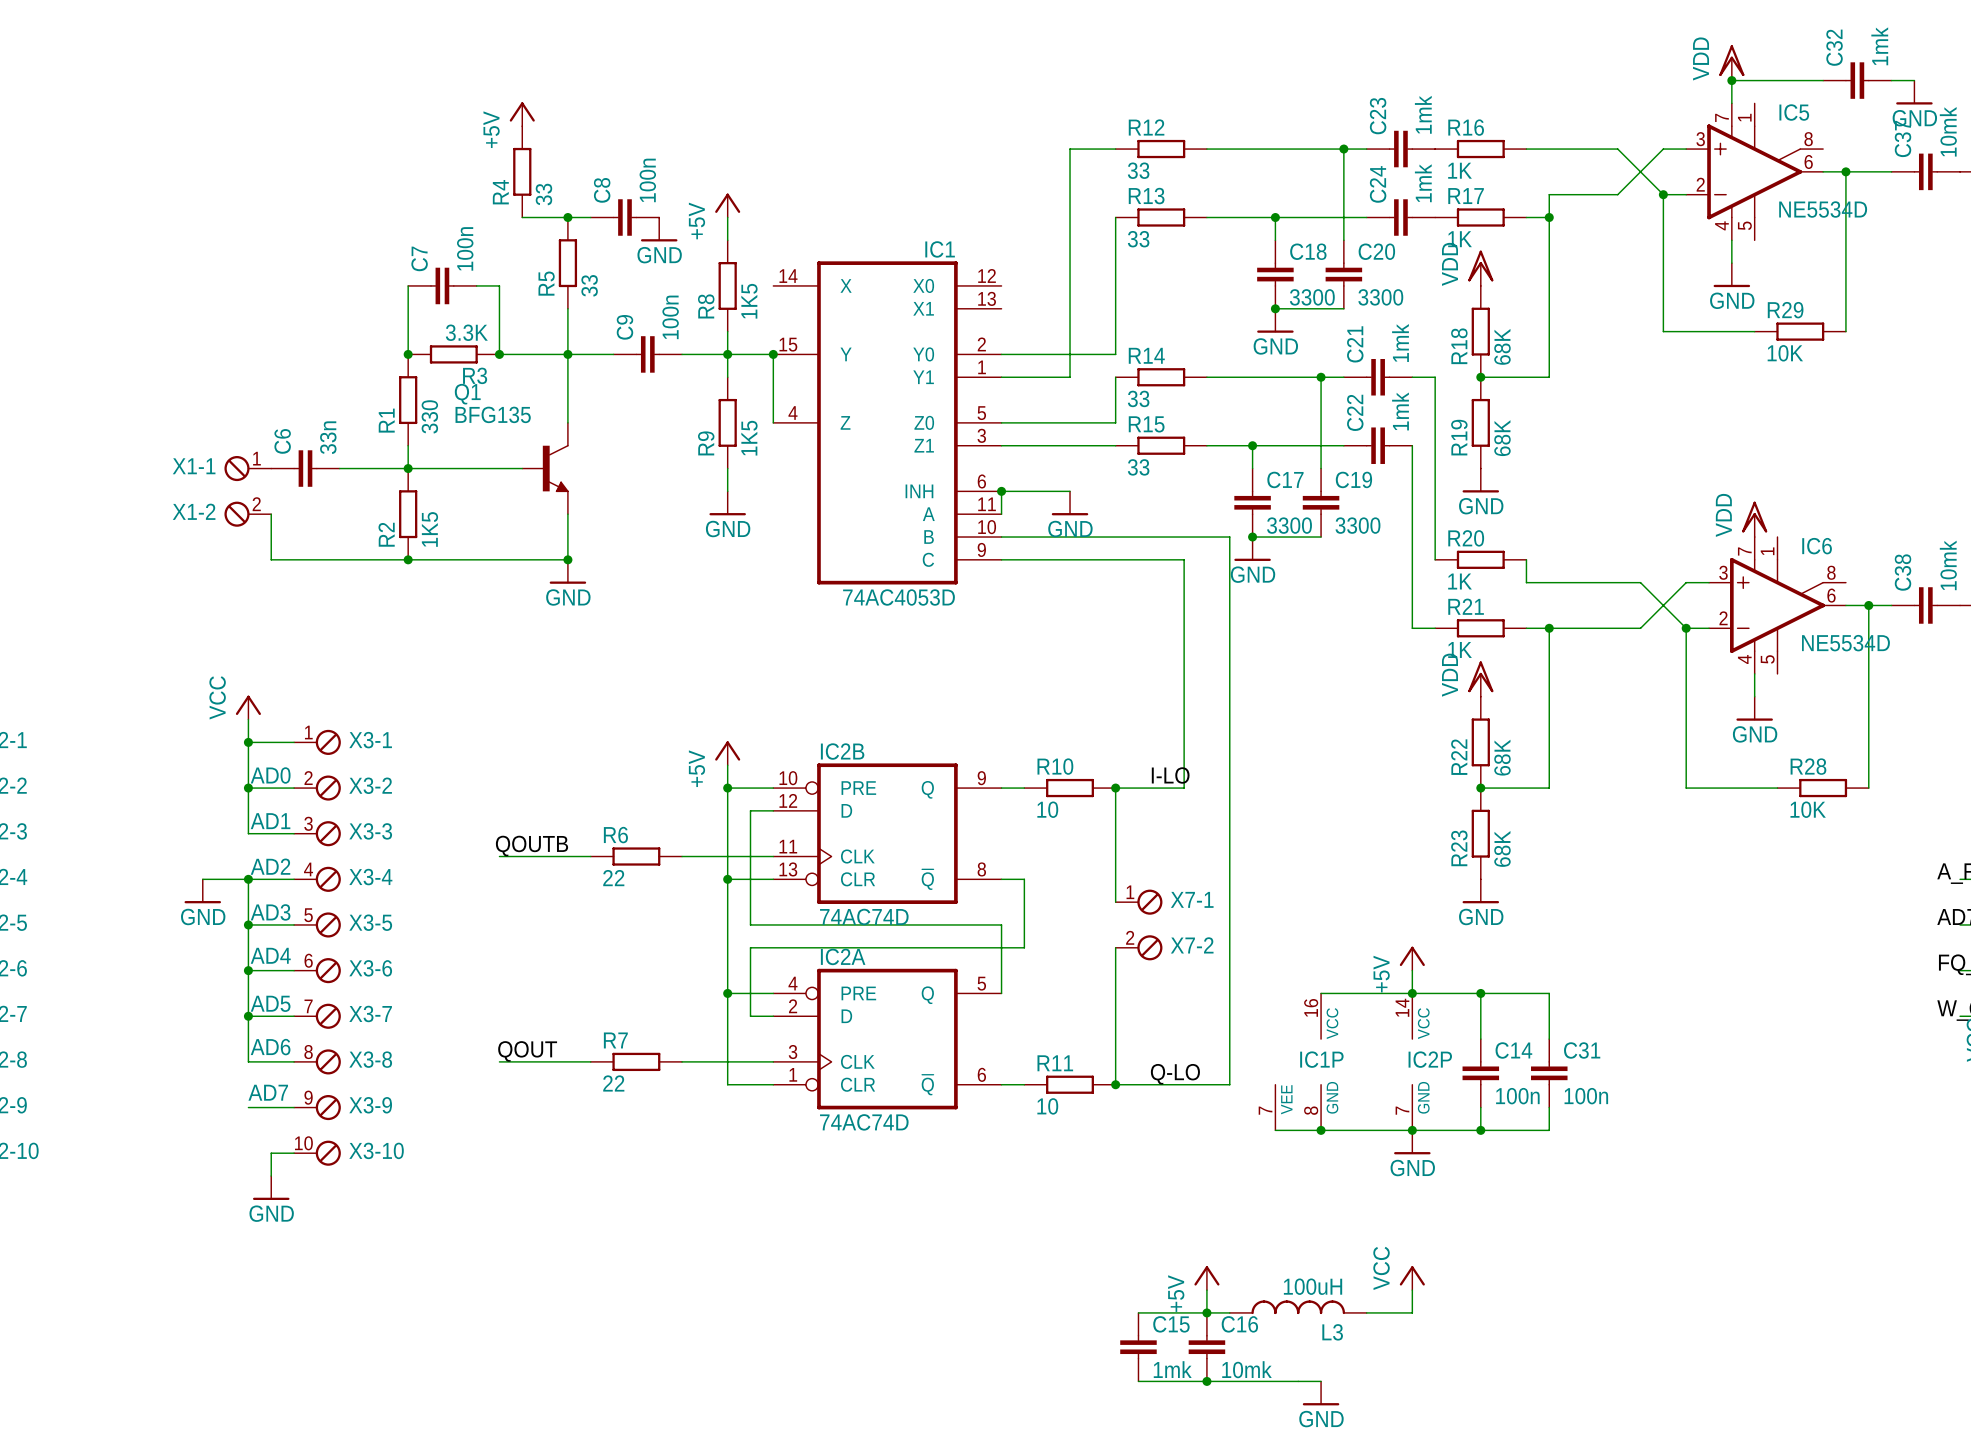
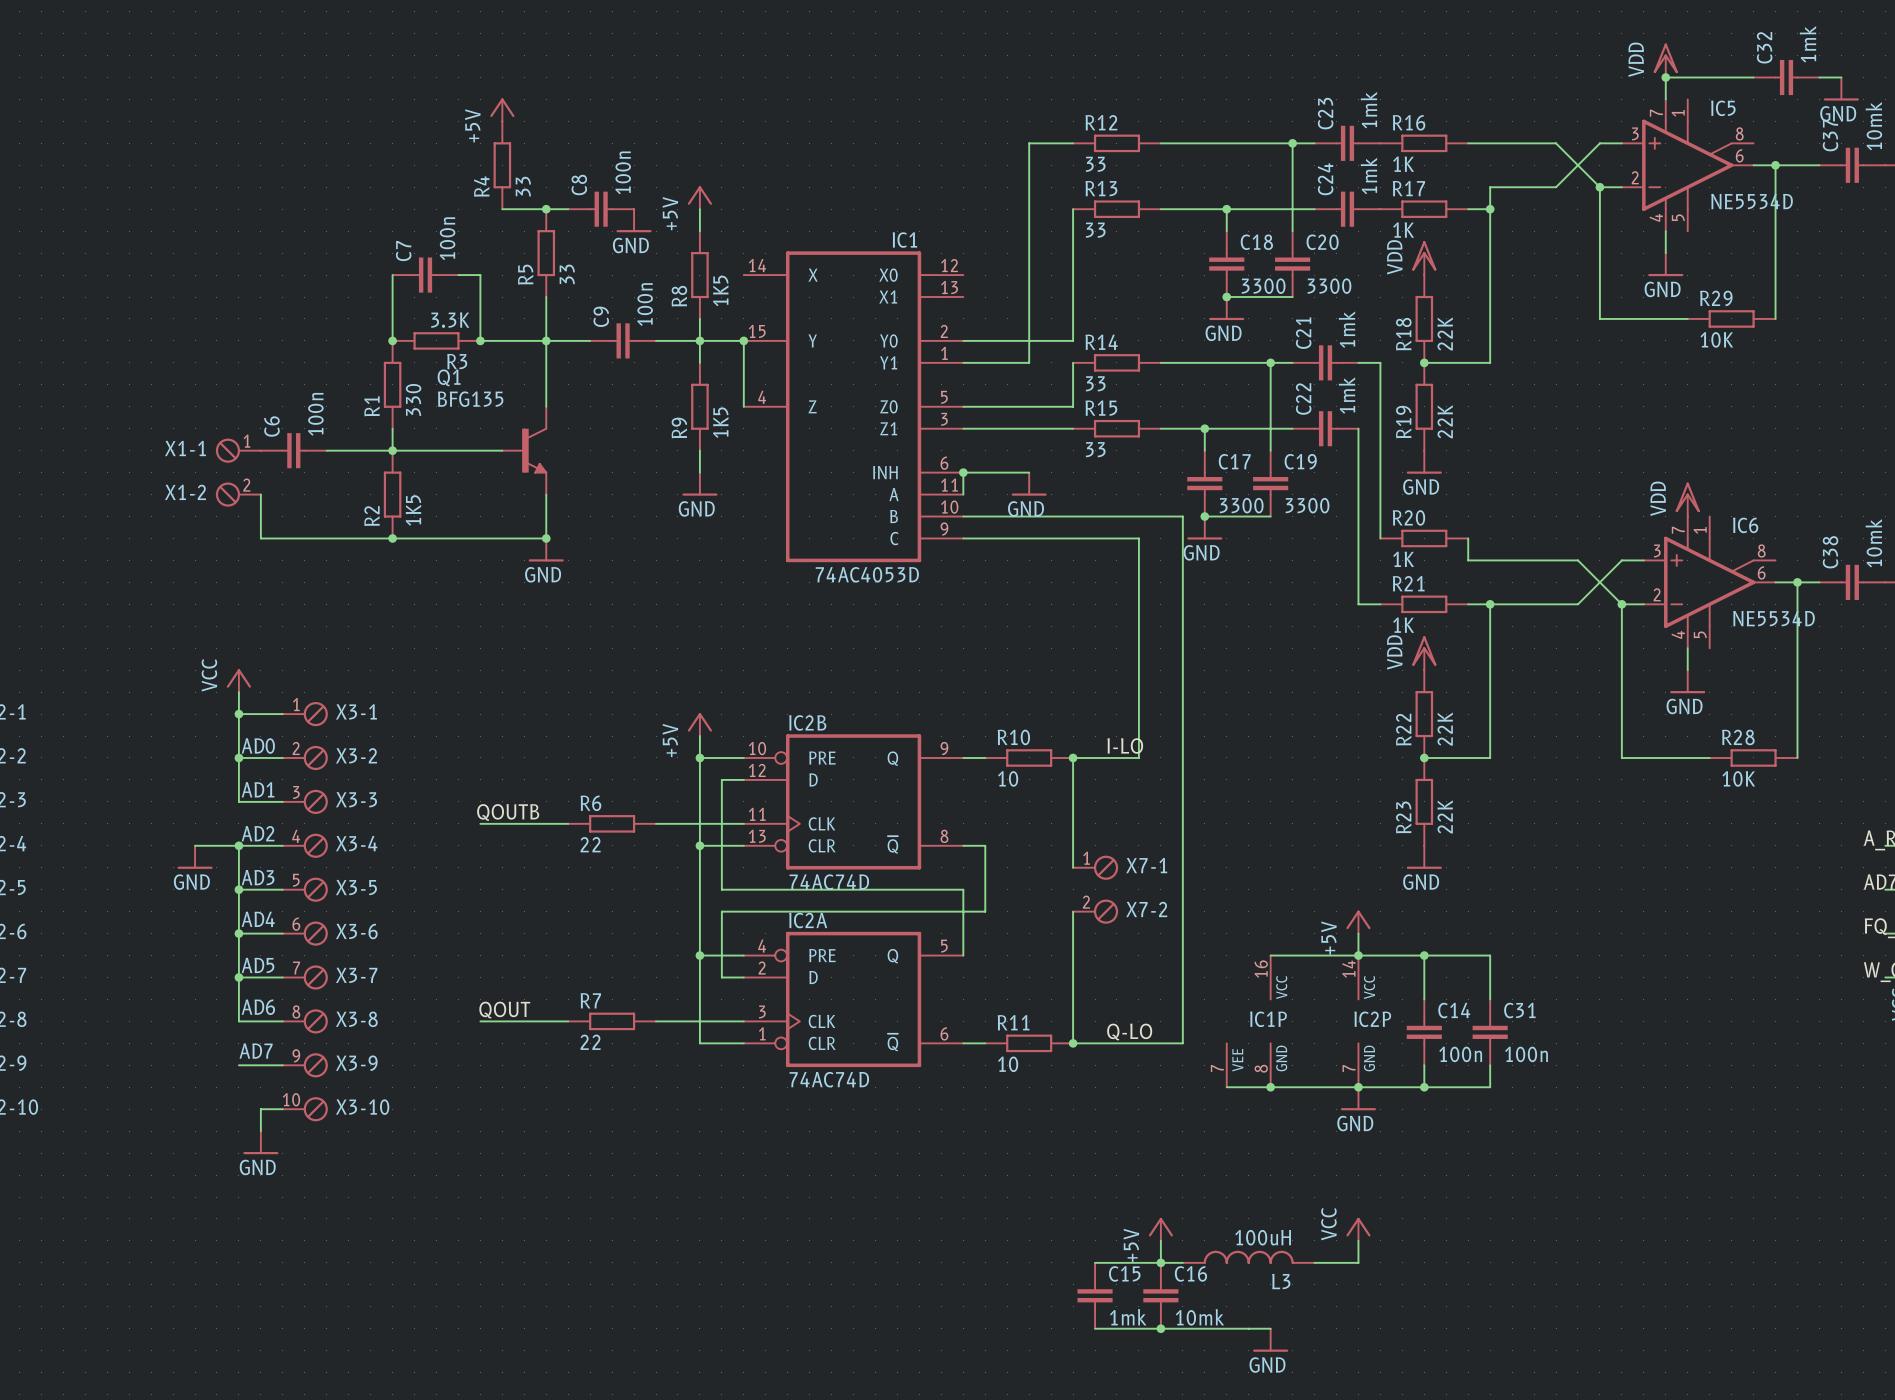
R18 value: 68K (1502, 346) -> 22K (1445, 333)
C6 value: 33n (328, 437) -> 100n (315, 414)
R19 value: 68K (1502, 438) -> 22K (1445, 421)
R22 value: 68K (1502, 757) -> 22K (1445, 729)
R23 value: 68K (1502, 848) -> 22K (1445, 816)

